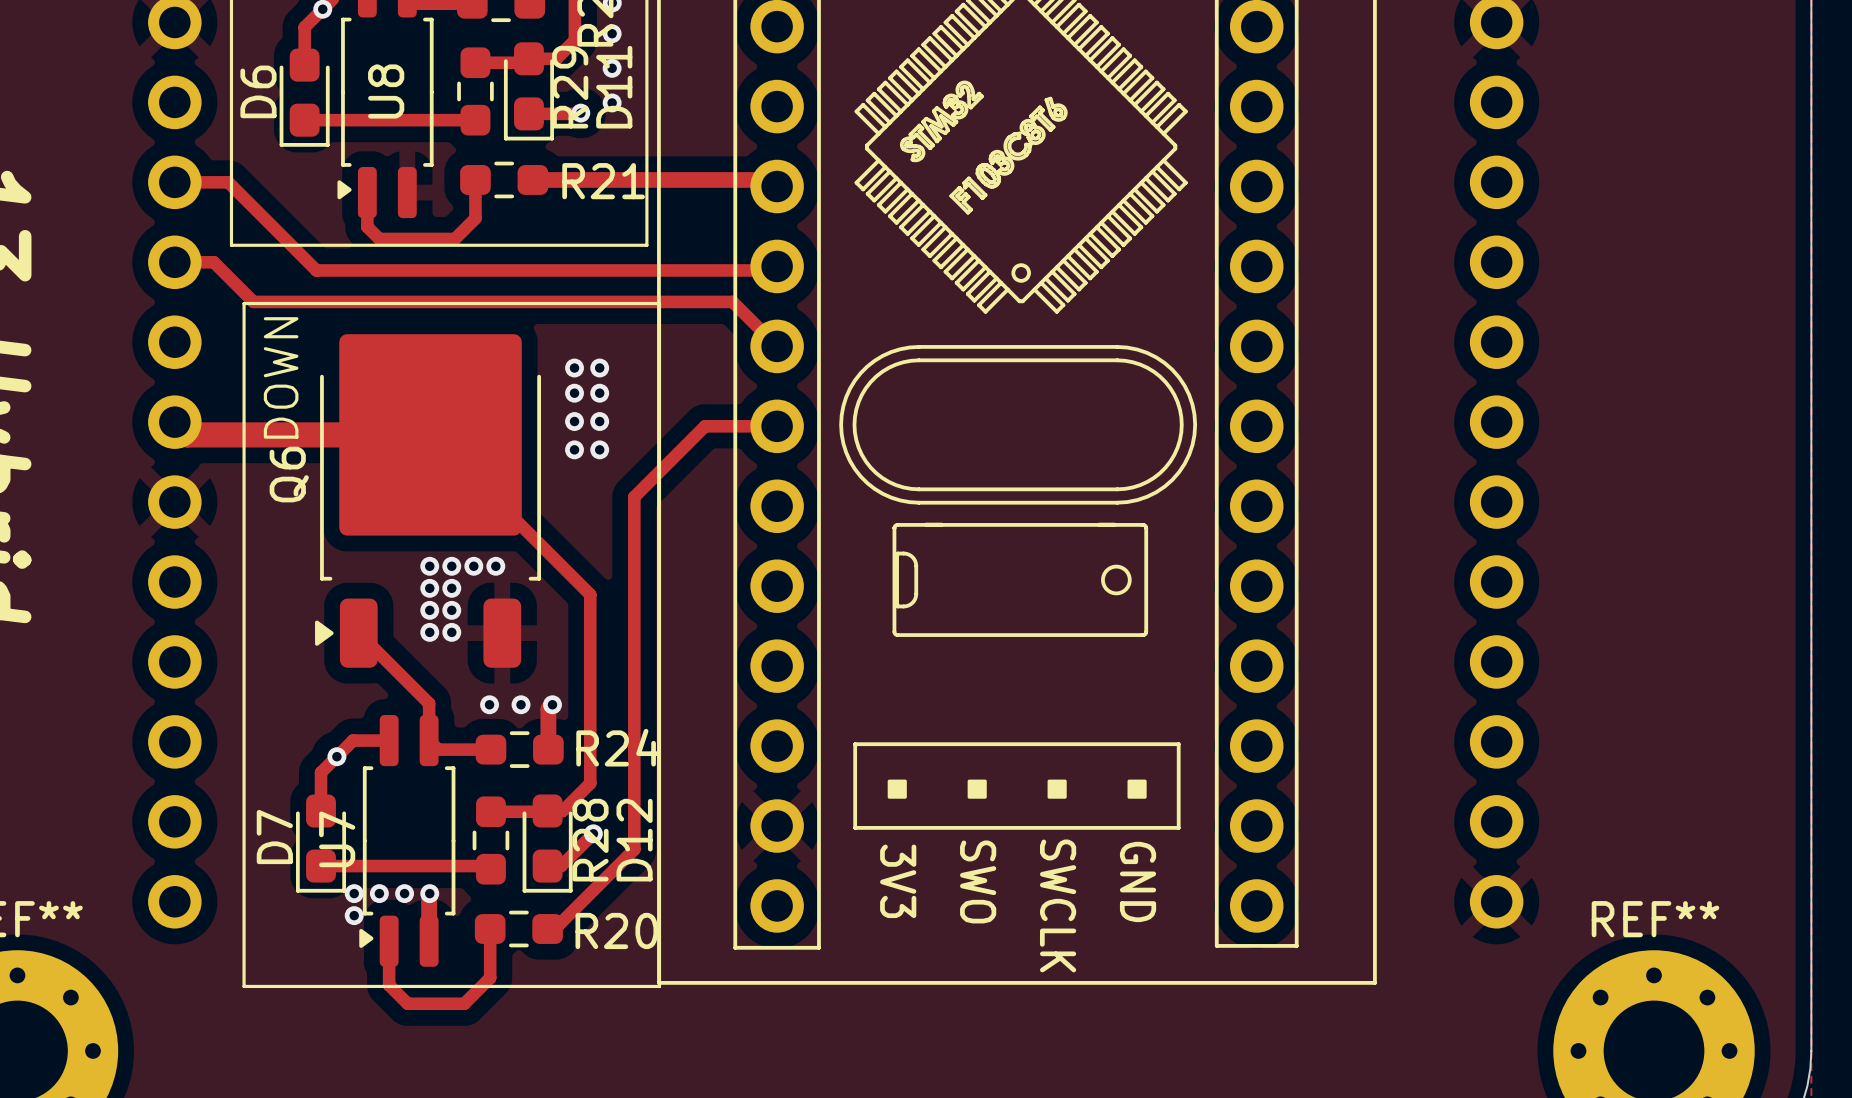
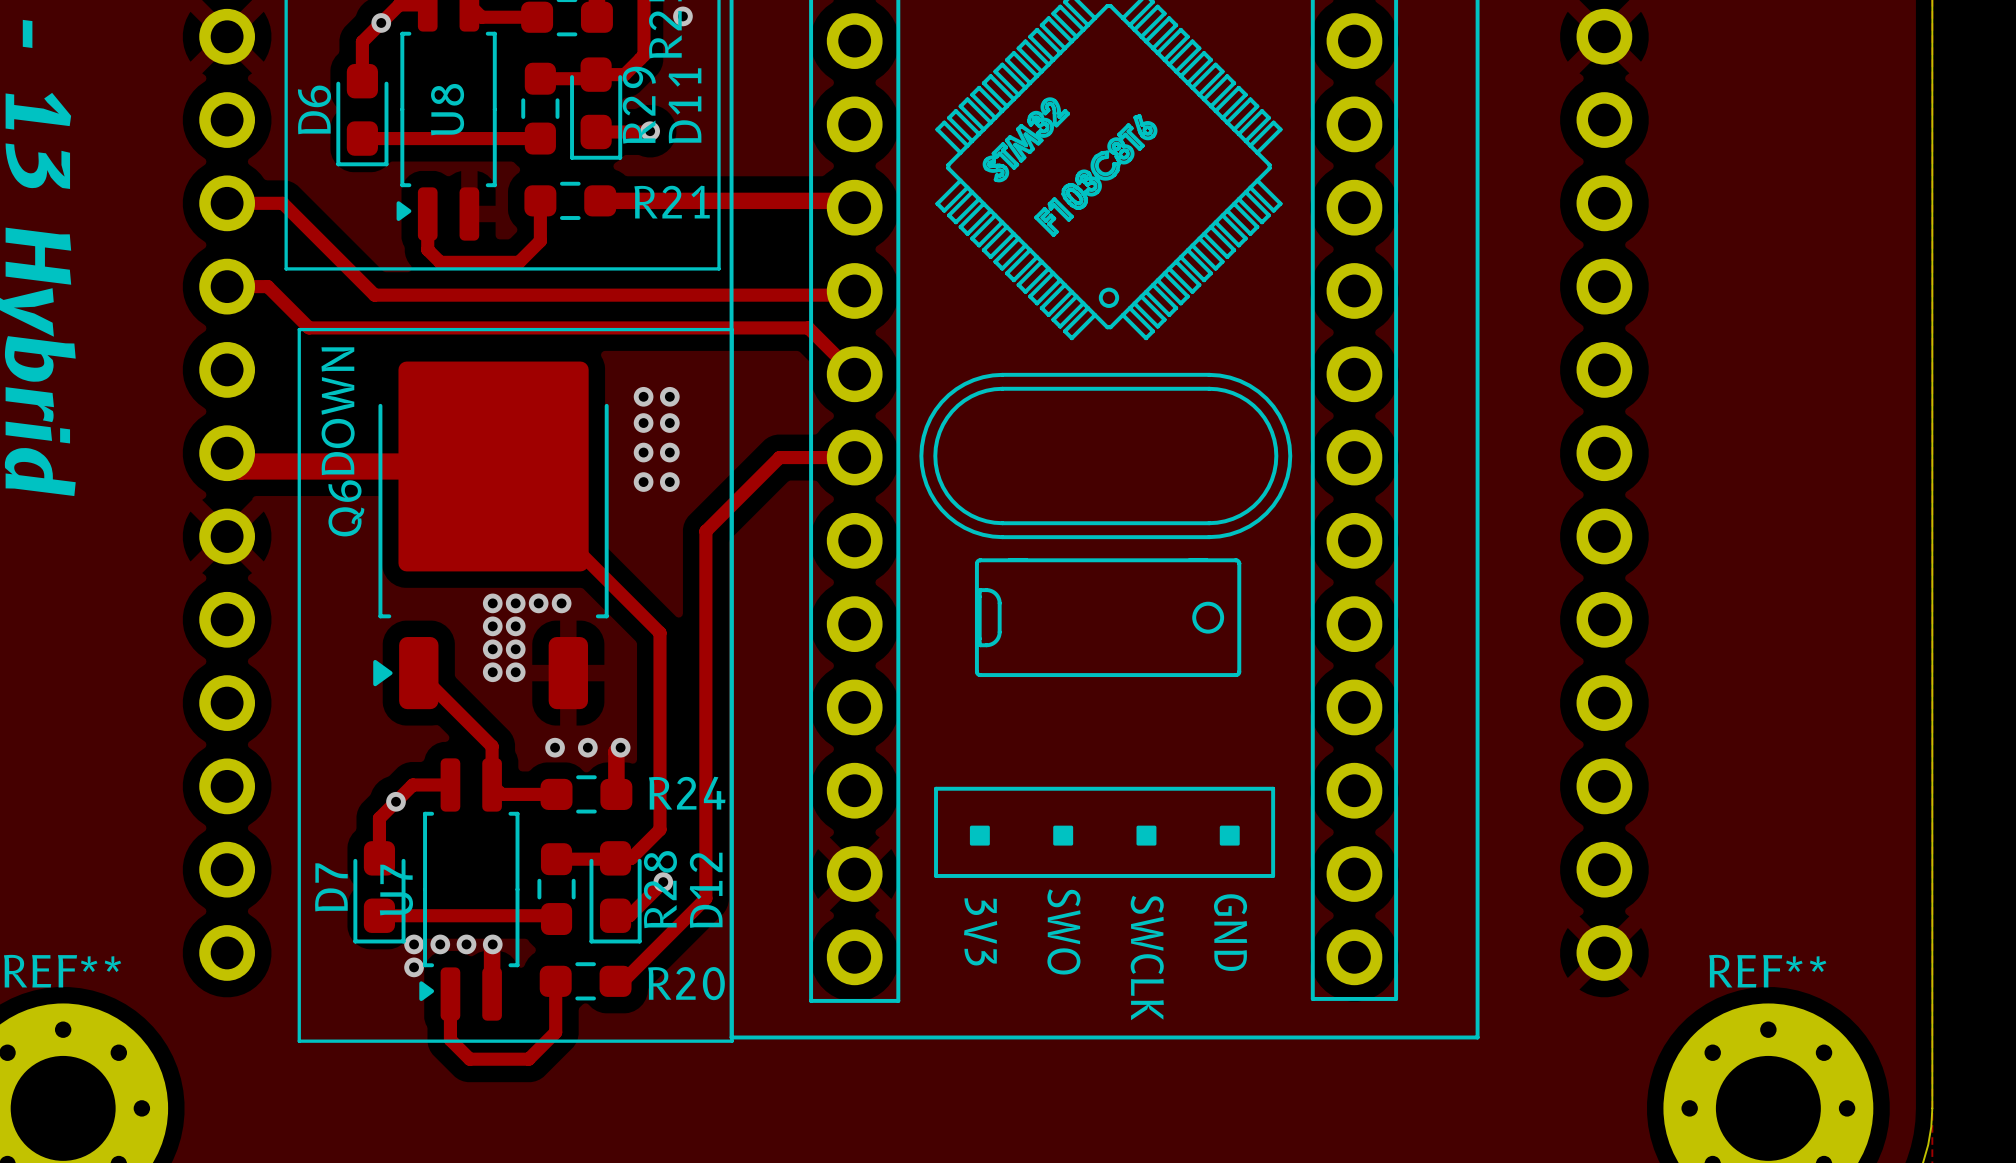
via: (612, 33) -> none
via: (612, 68) -> none
via: (612, 102) -> none

